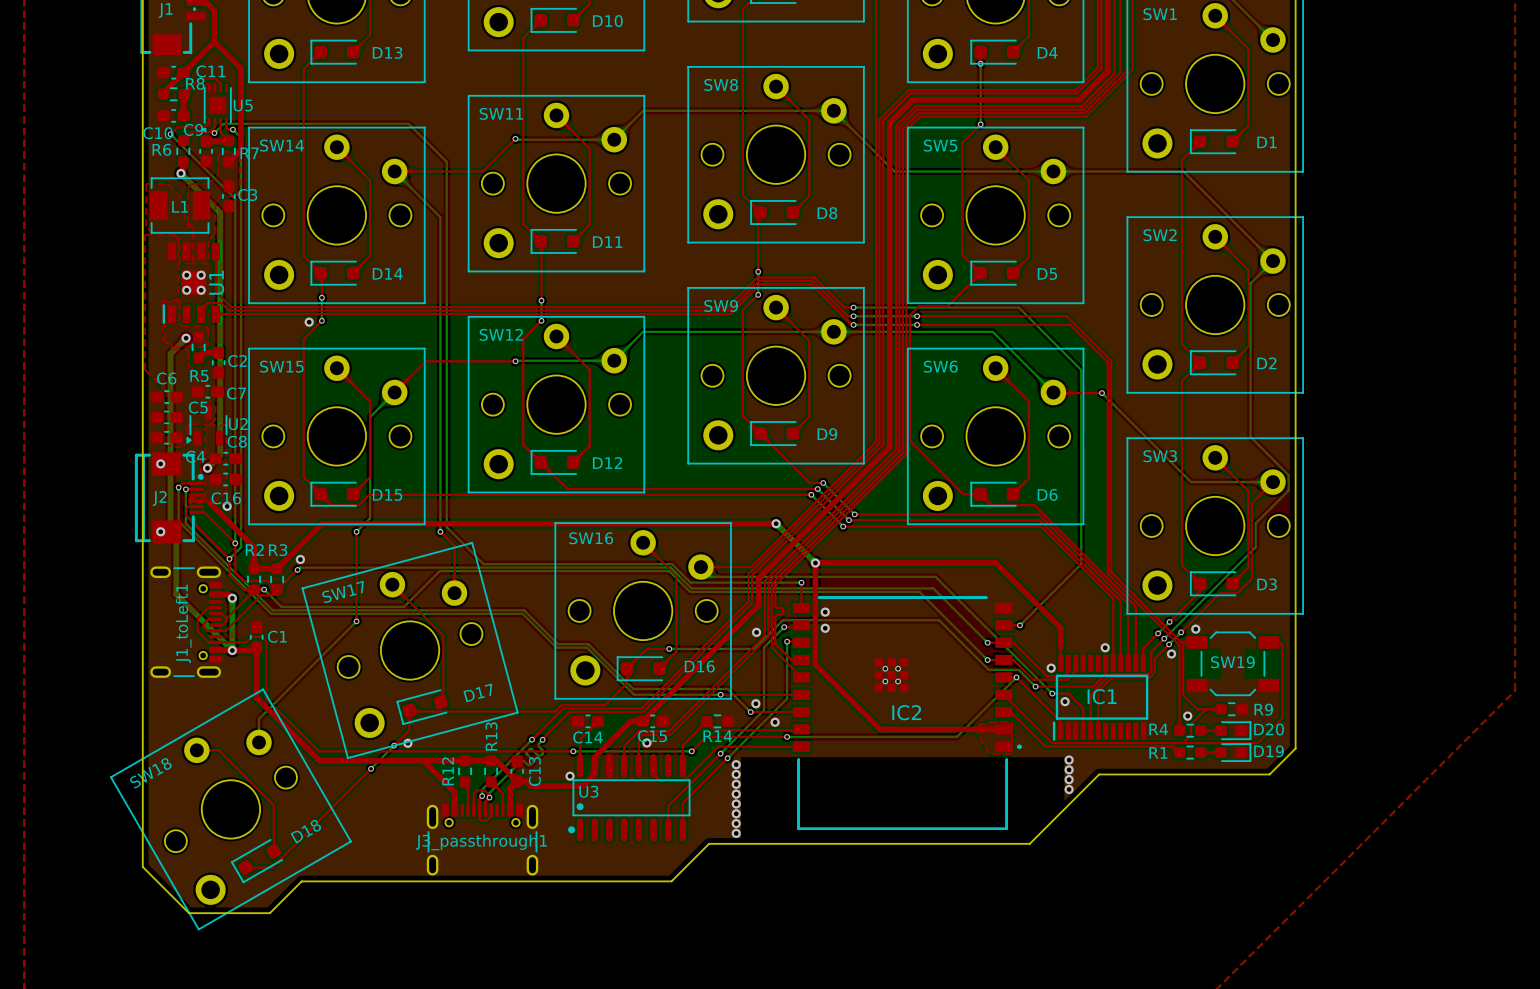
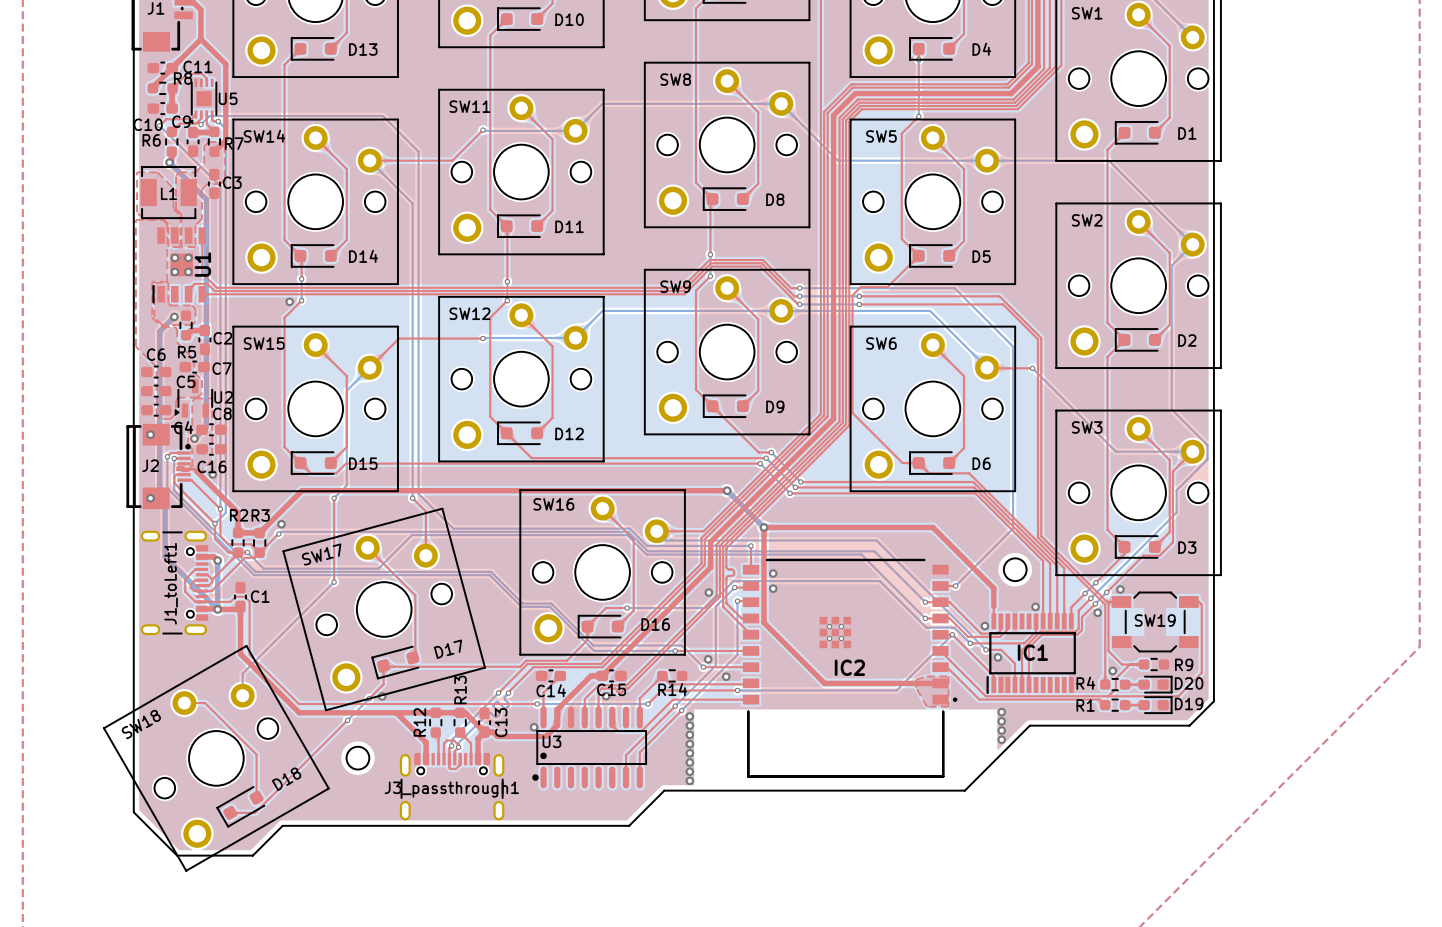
round board edge: none -> [1003, 558, 1027, 582]
round board edge: none -> [346, 746, 370, 770]

